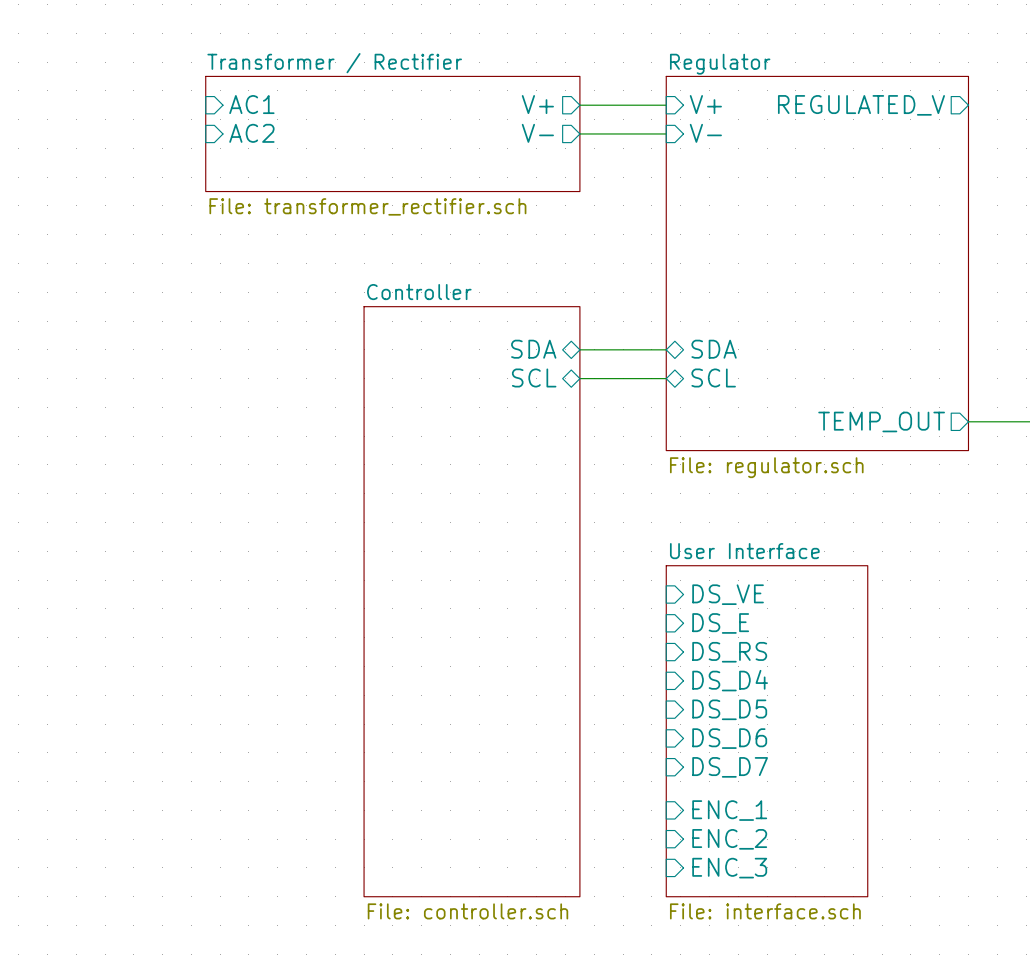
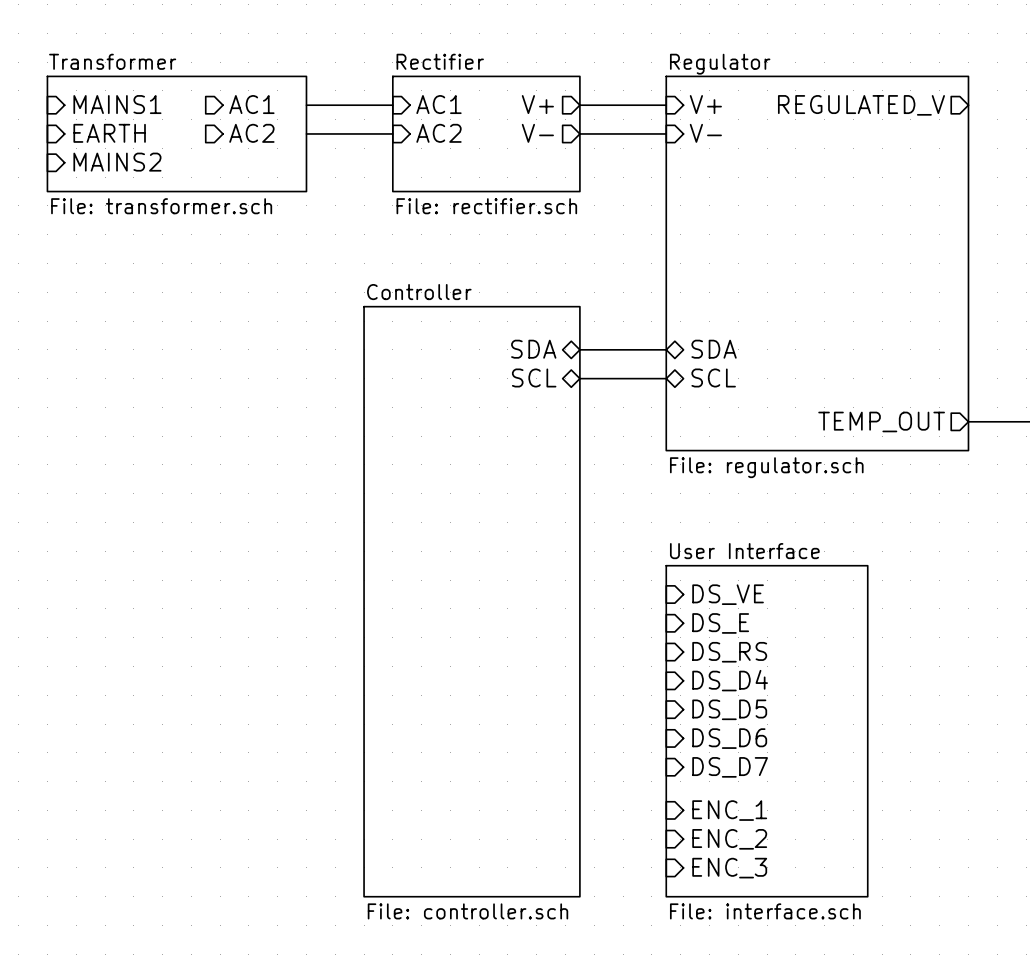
sheet pin: none -> MAINS1 (117, 104)
sheet pin: none -> AC1 (438, 104)
wire: none -> (306, 105) (392, 105)
sheet pin: none -> EARTH (109, 133)
sheet Transformer: none -> File: transformer.sch (176, 133)
wire: none -> (306, 133) (392, 133)
sheet Transformer / Rectifier: File: transformer_rectifier.sch (392, 133) -> none
sheet pin: none -> AC2 (438, 133)
sheet Rectifier: none -> File: rectifier.sch (486, 133)
sheet pin: none -> MAINS2 (117, 162)

